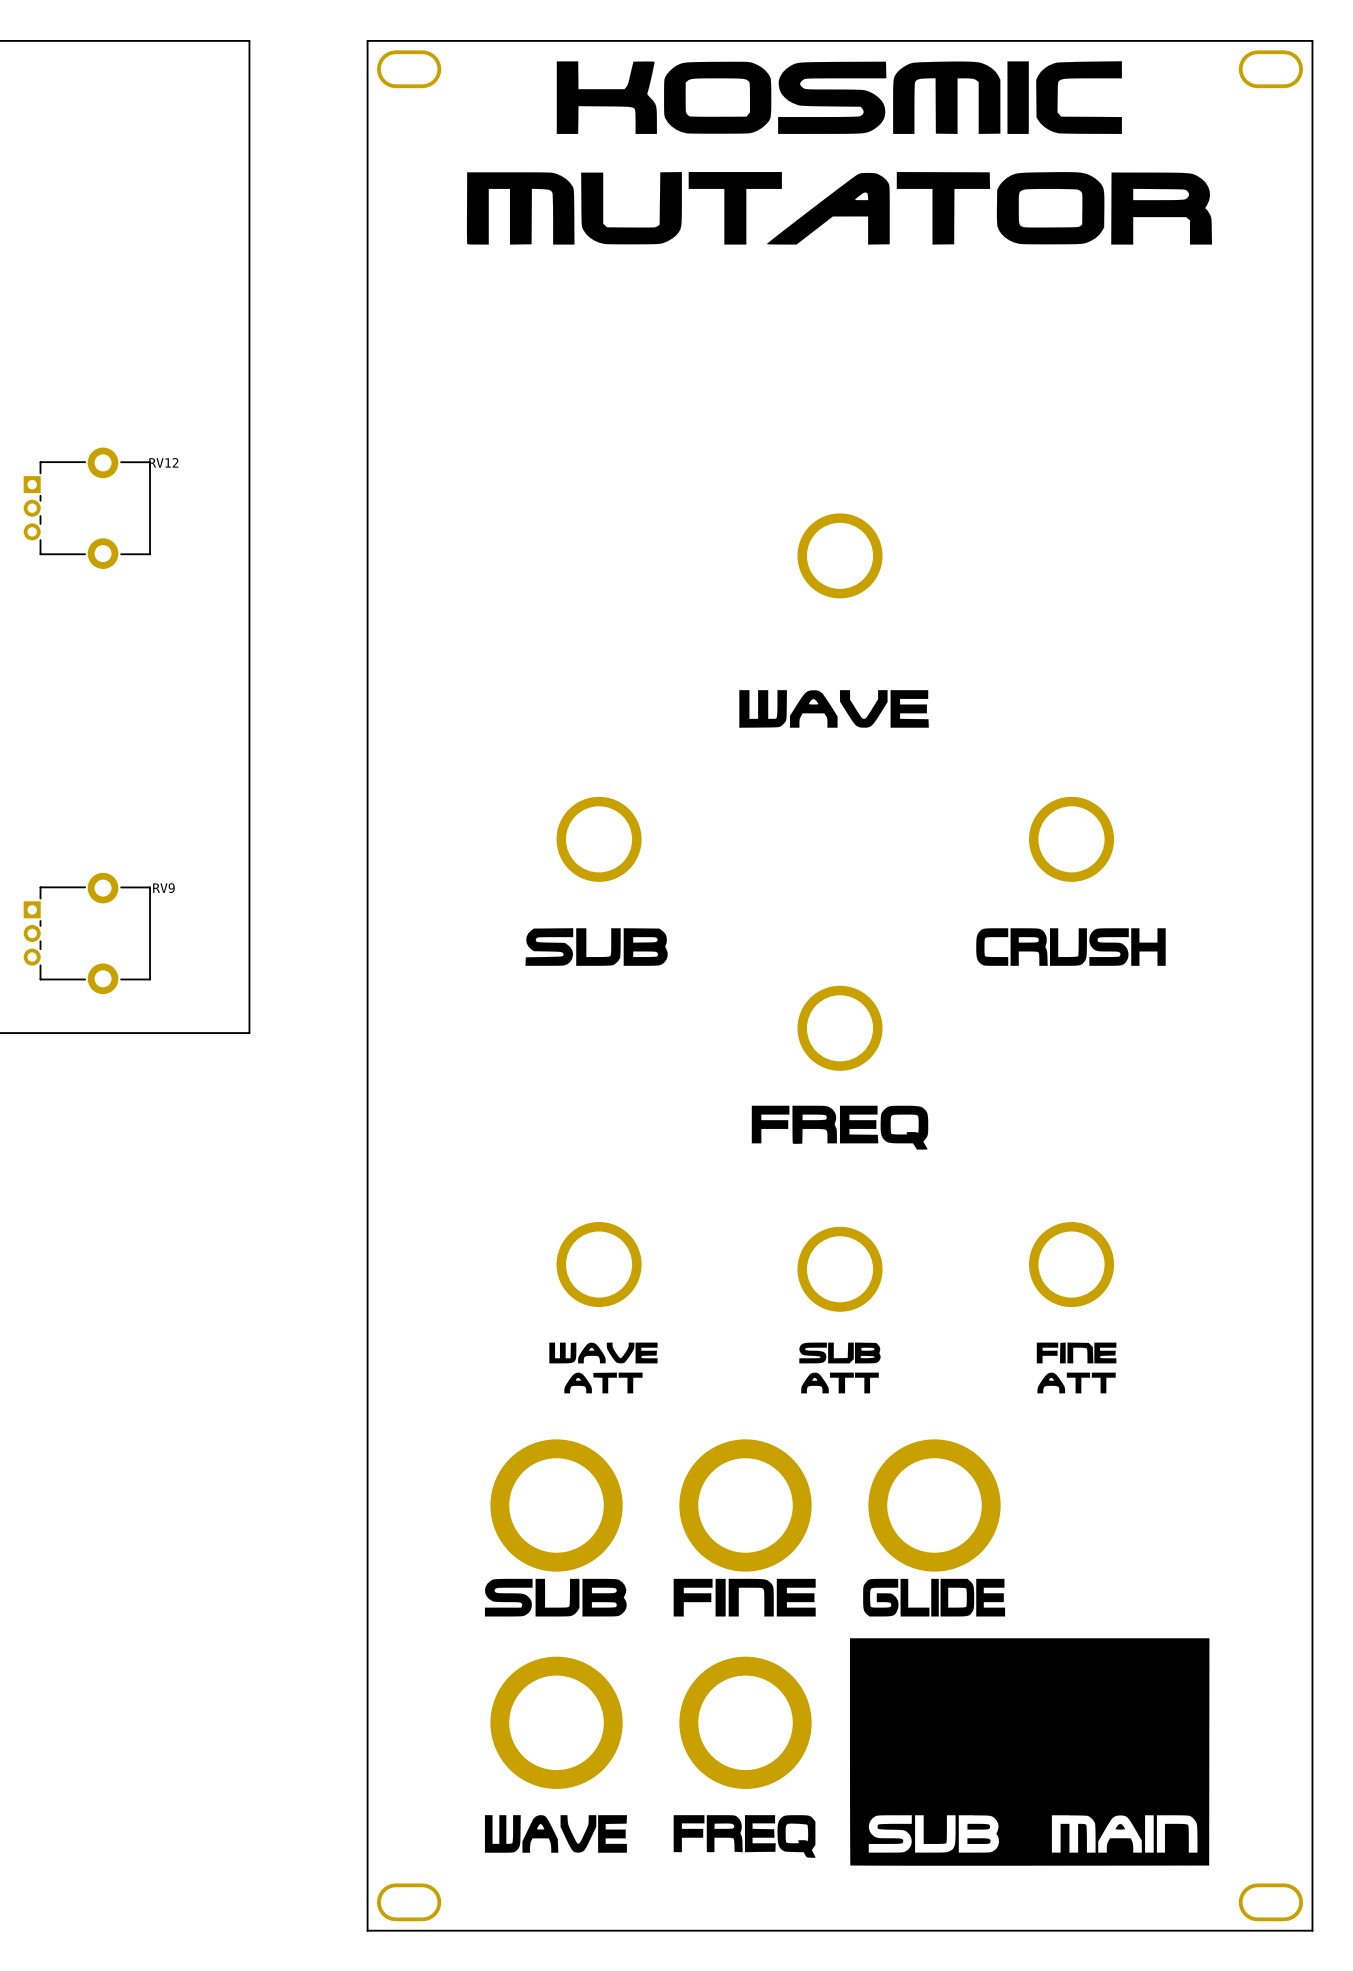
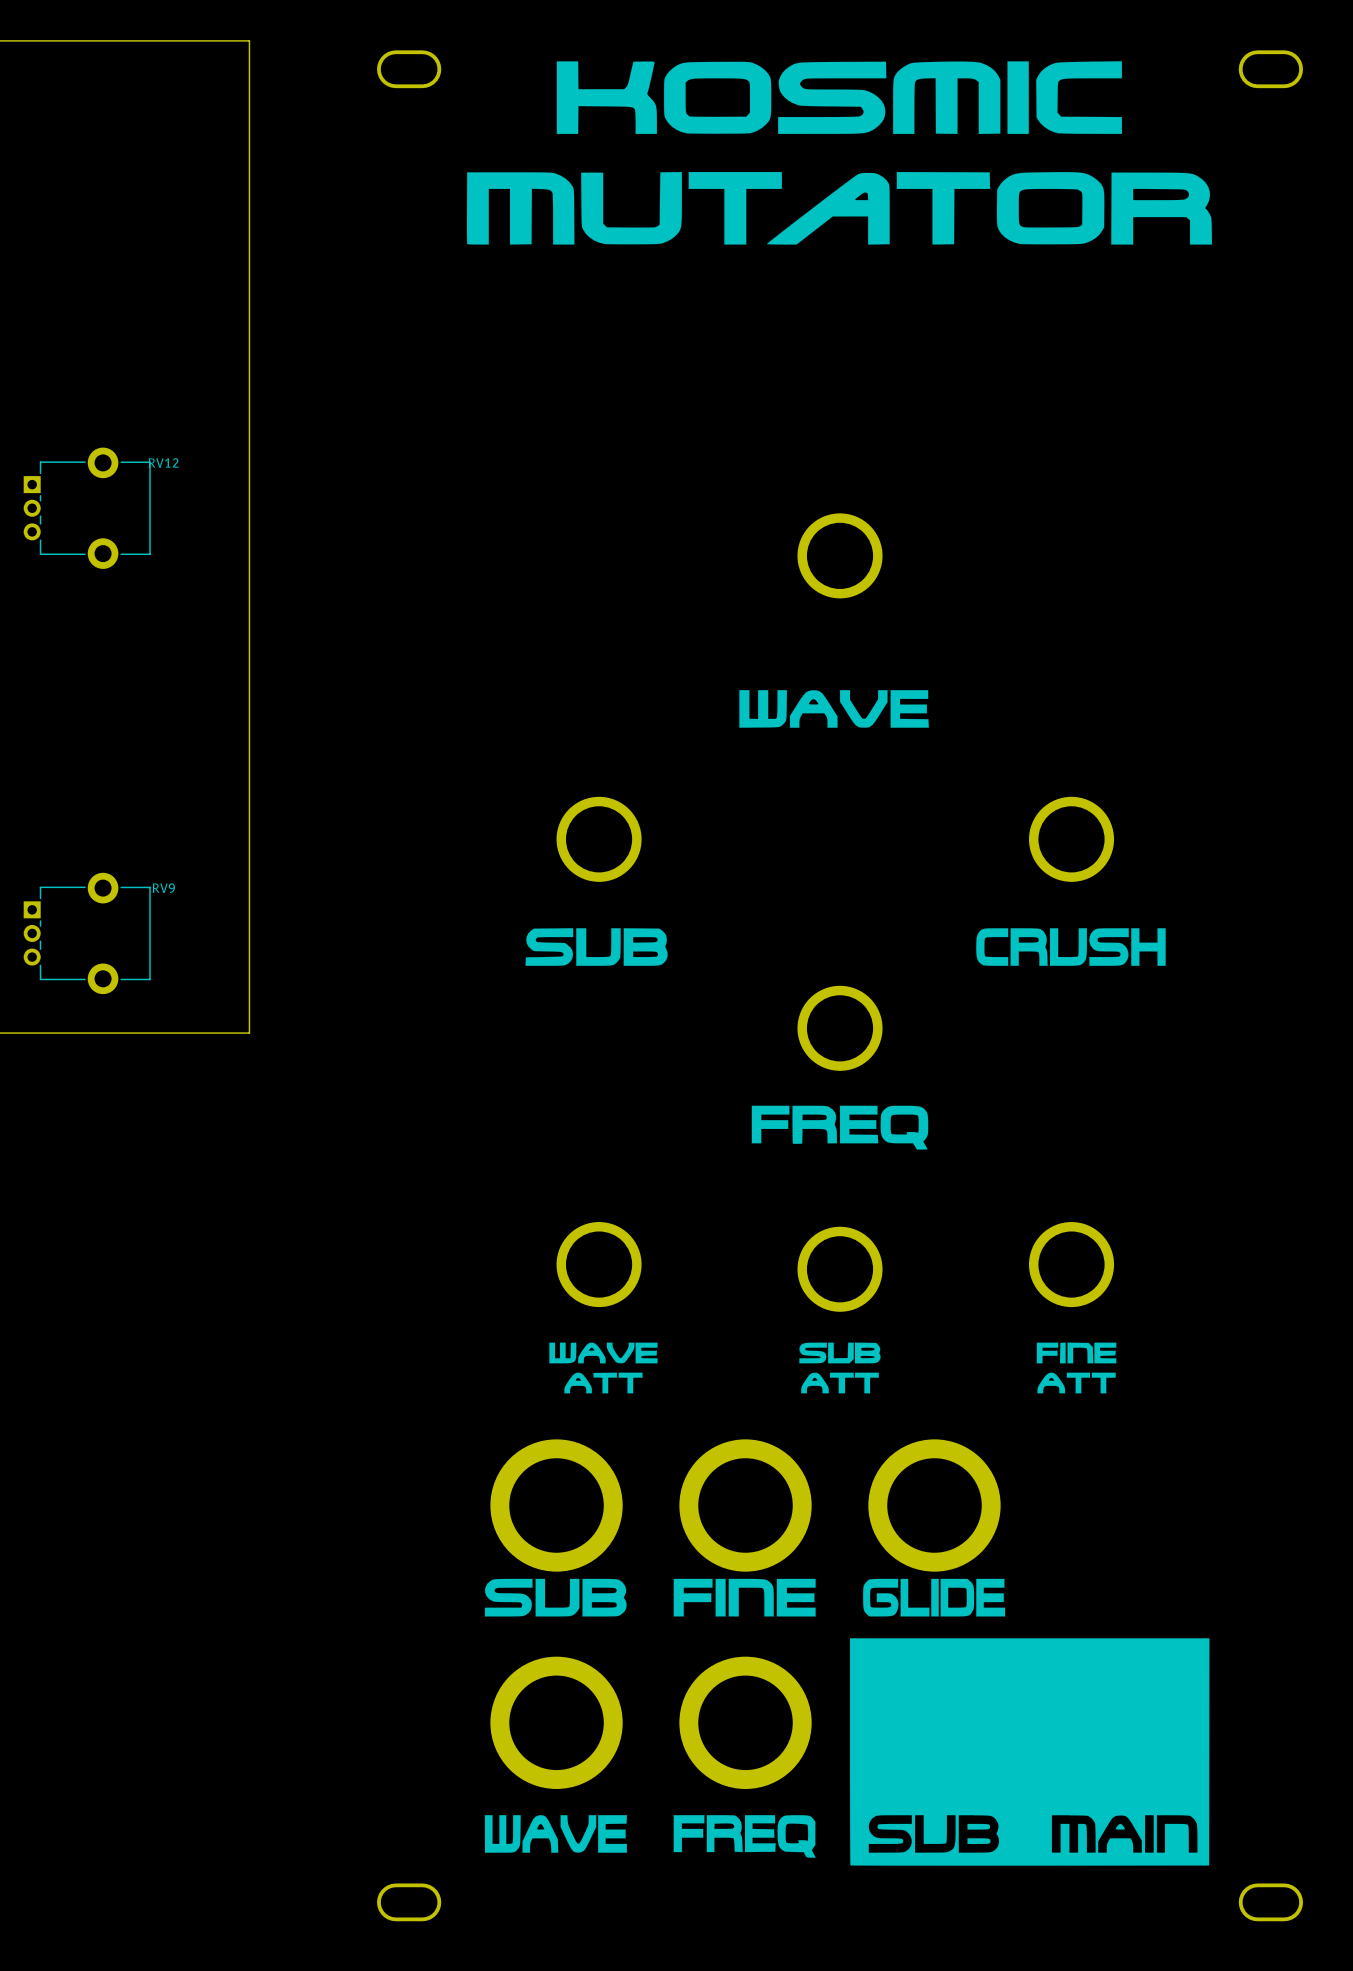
board edge: (367, 40) (367, 1930) (1312, 1930) (1312, 40) (367, 40) -> none

